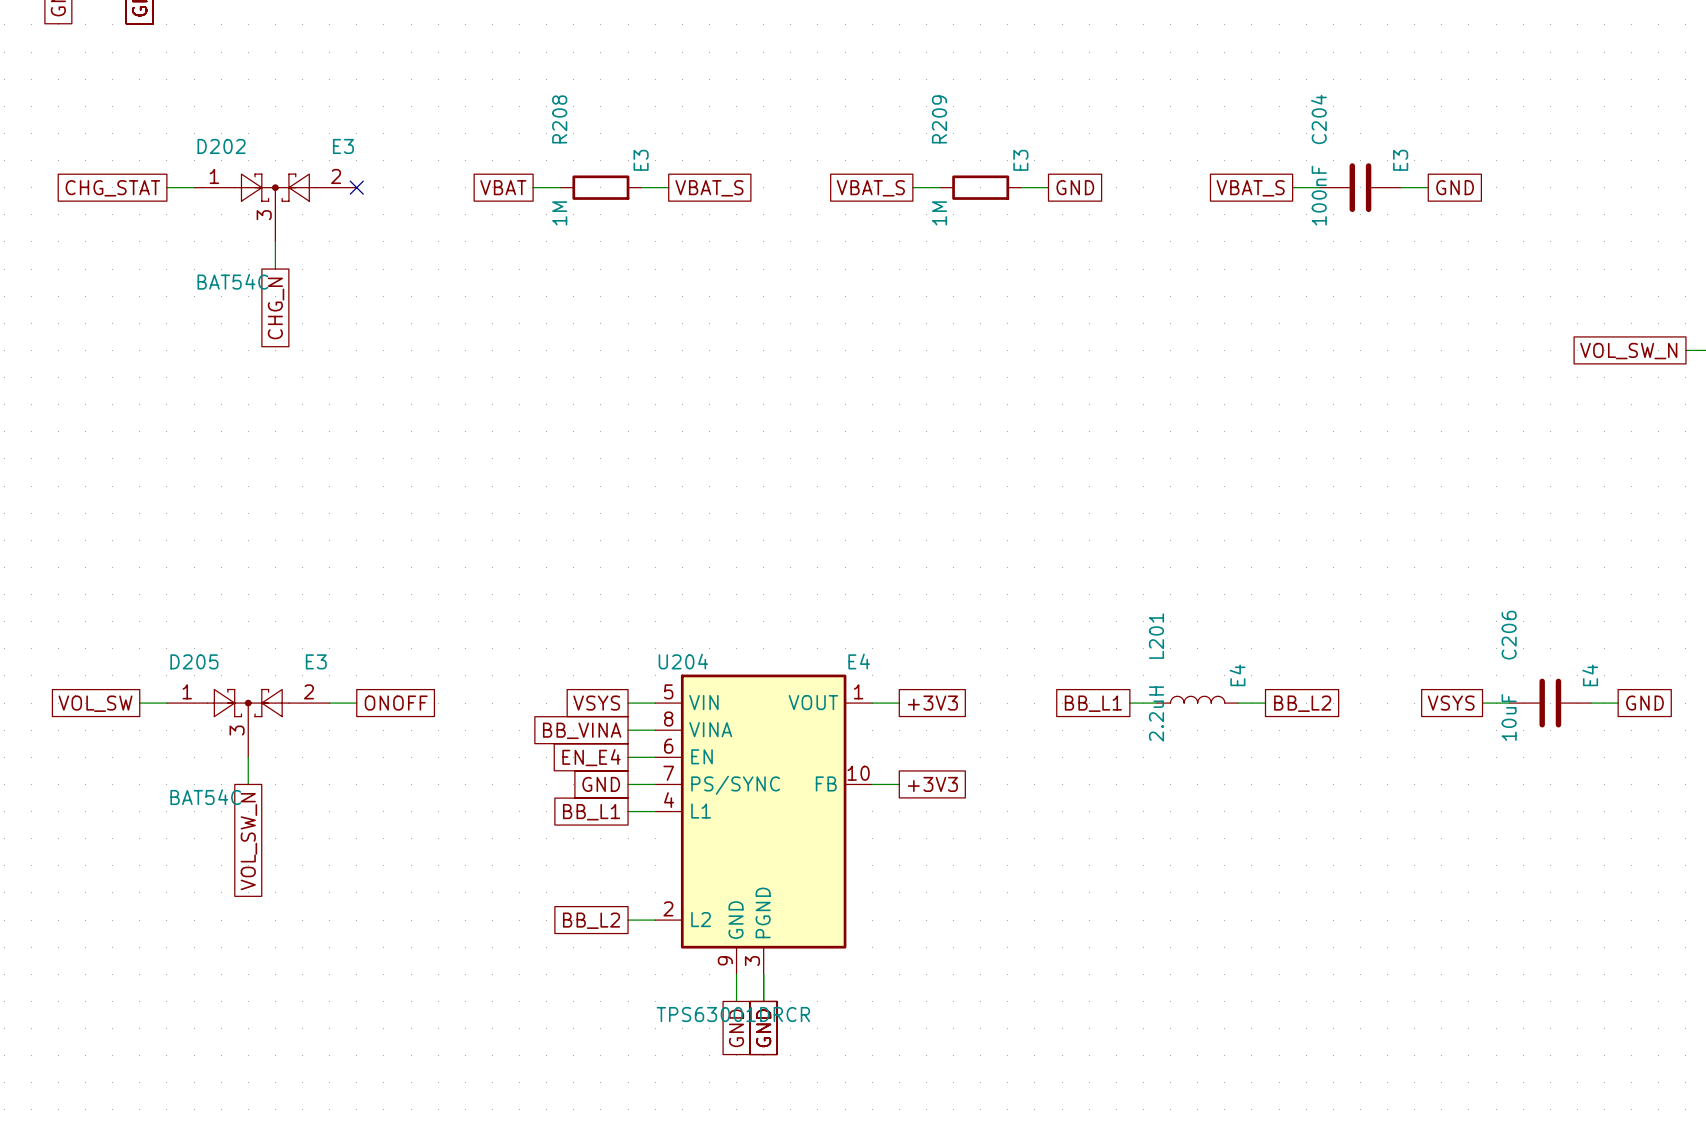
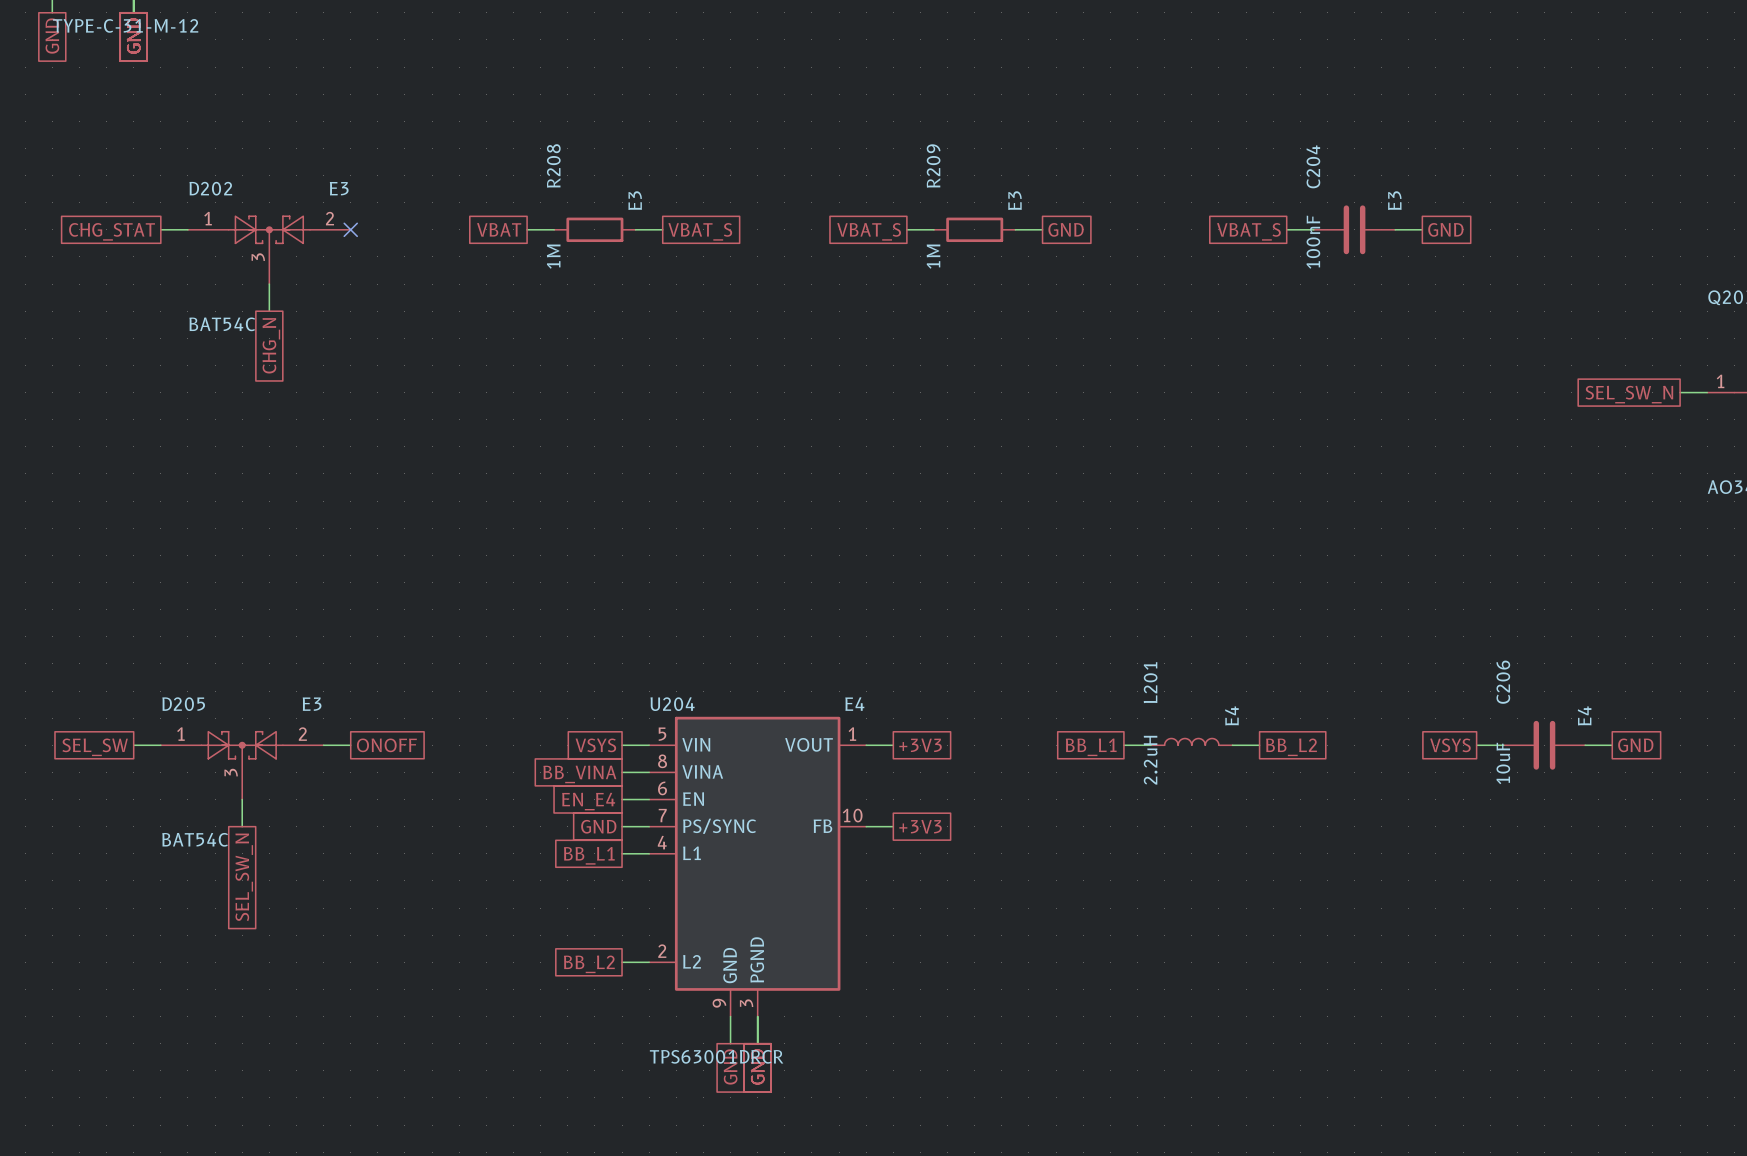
global label: VOL_SW_N (1628, 351) -> SEL_SW_N (1629, 394)
global label: VOL_SW (95, 703) -> SEL_SW (95, 747)
global label: VOL_SW_N (248, 841) -> SEL_SW_N (244, 877)

